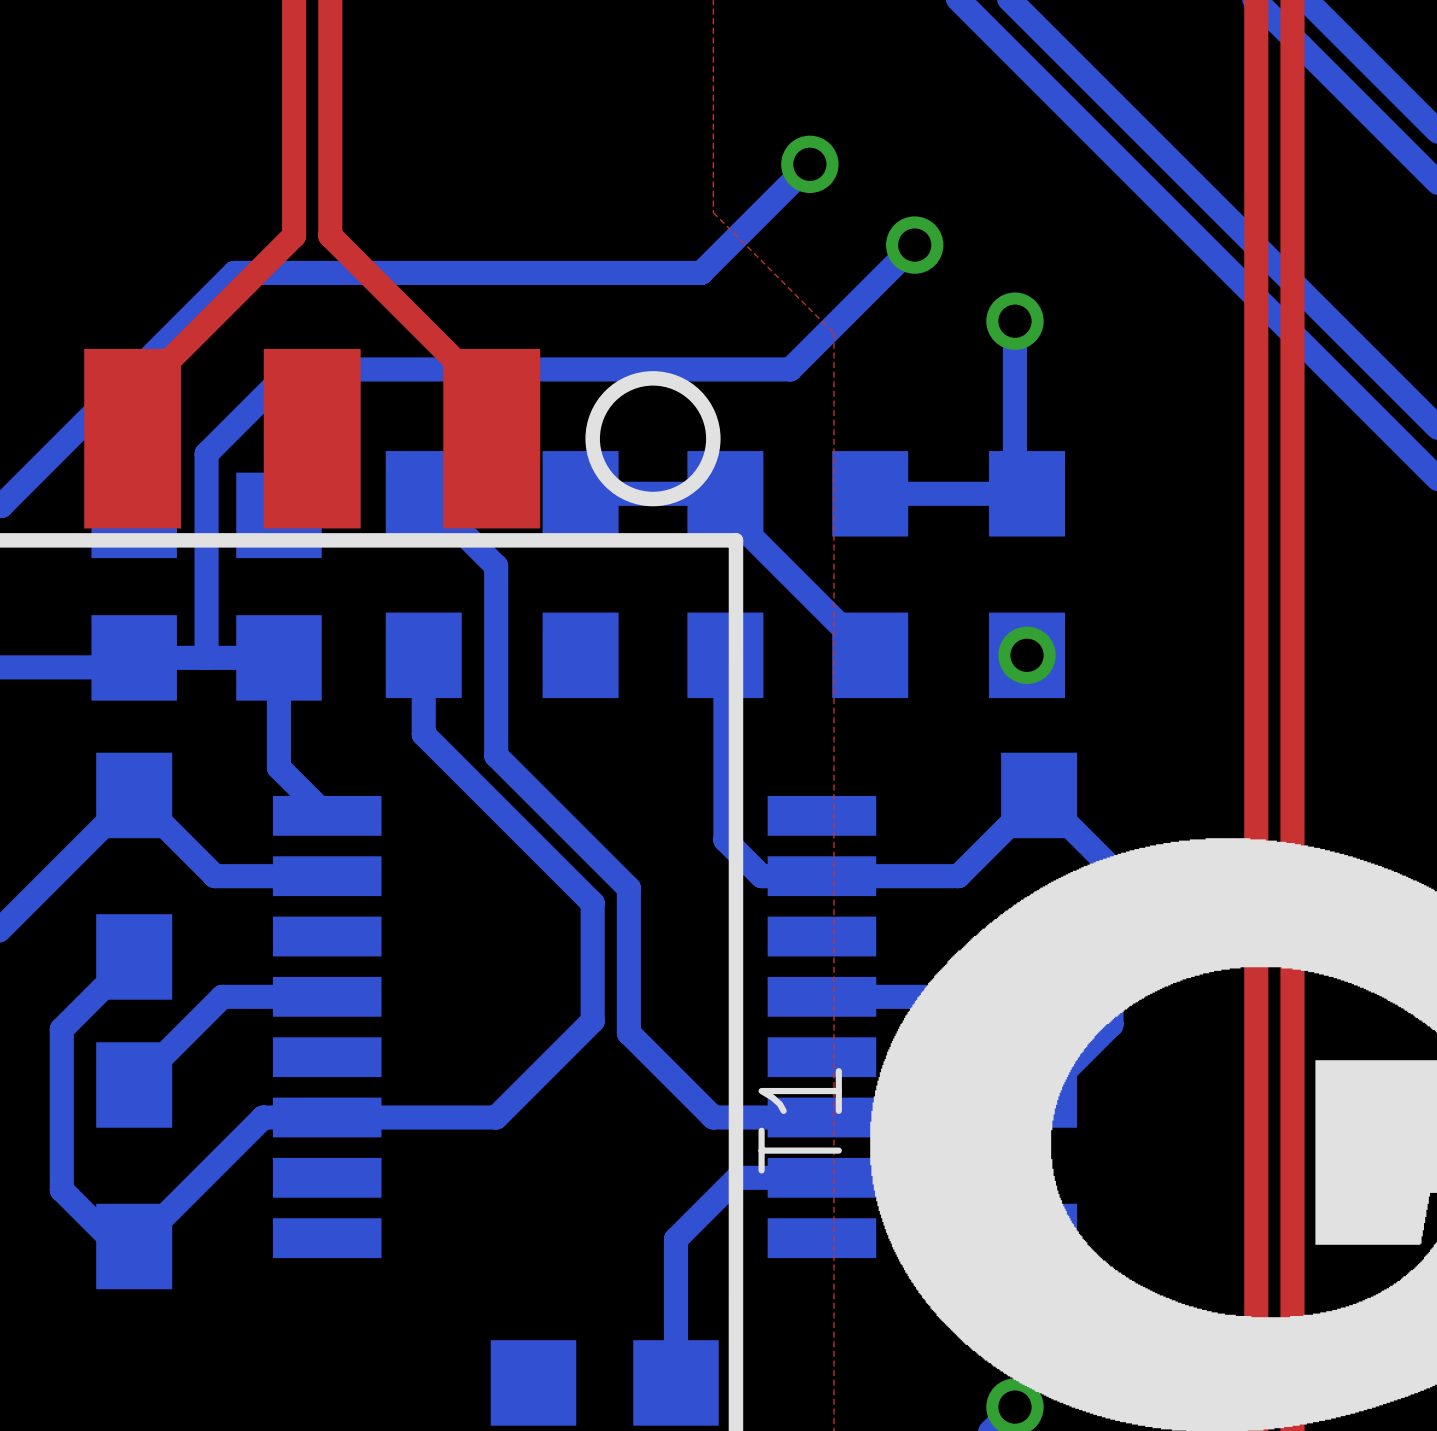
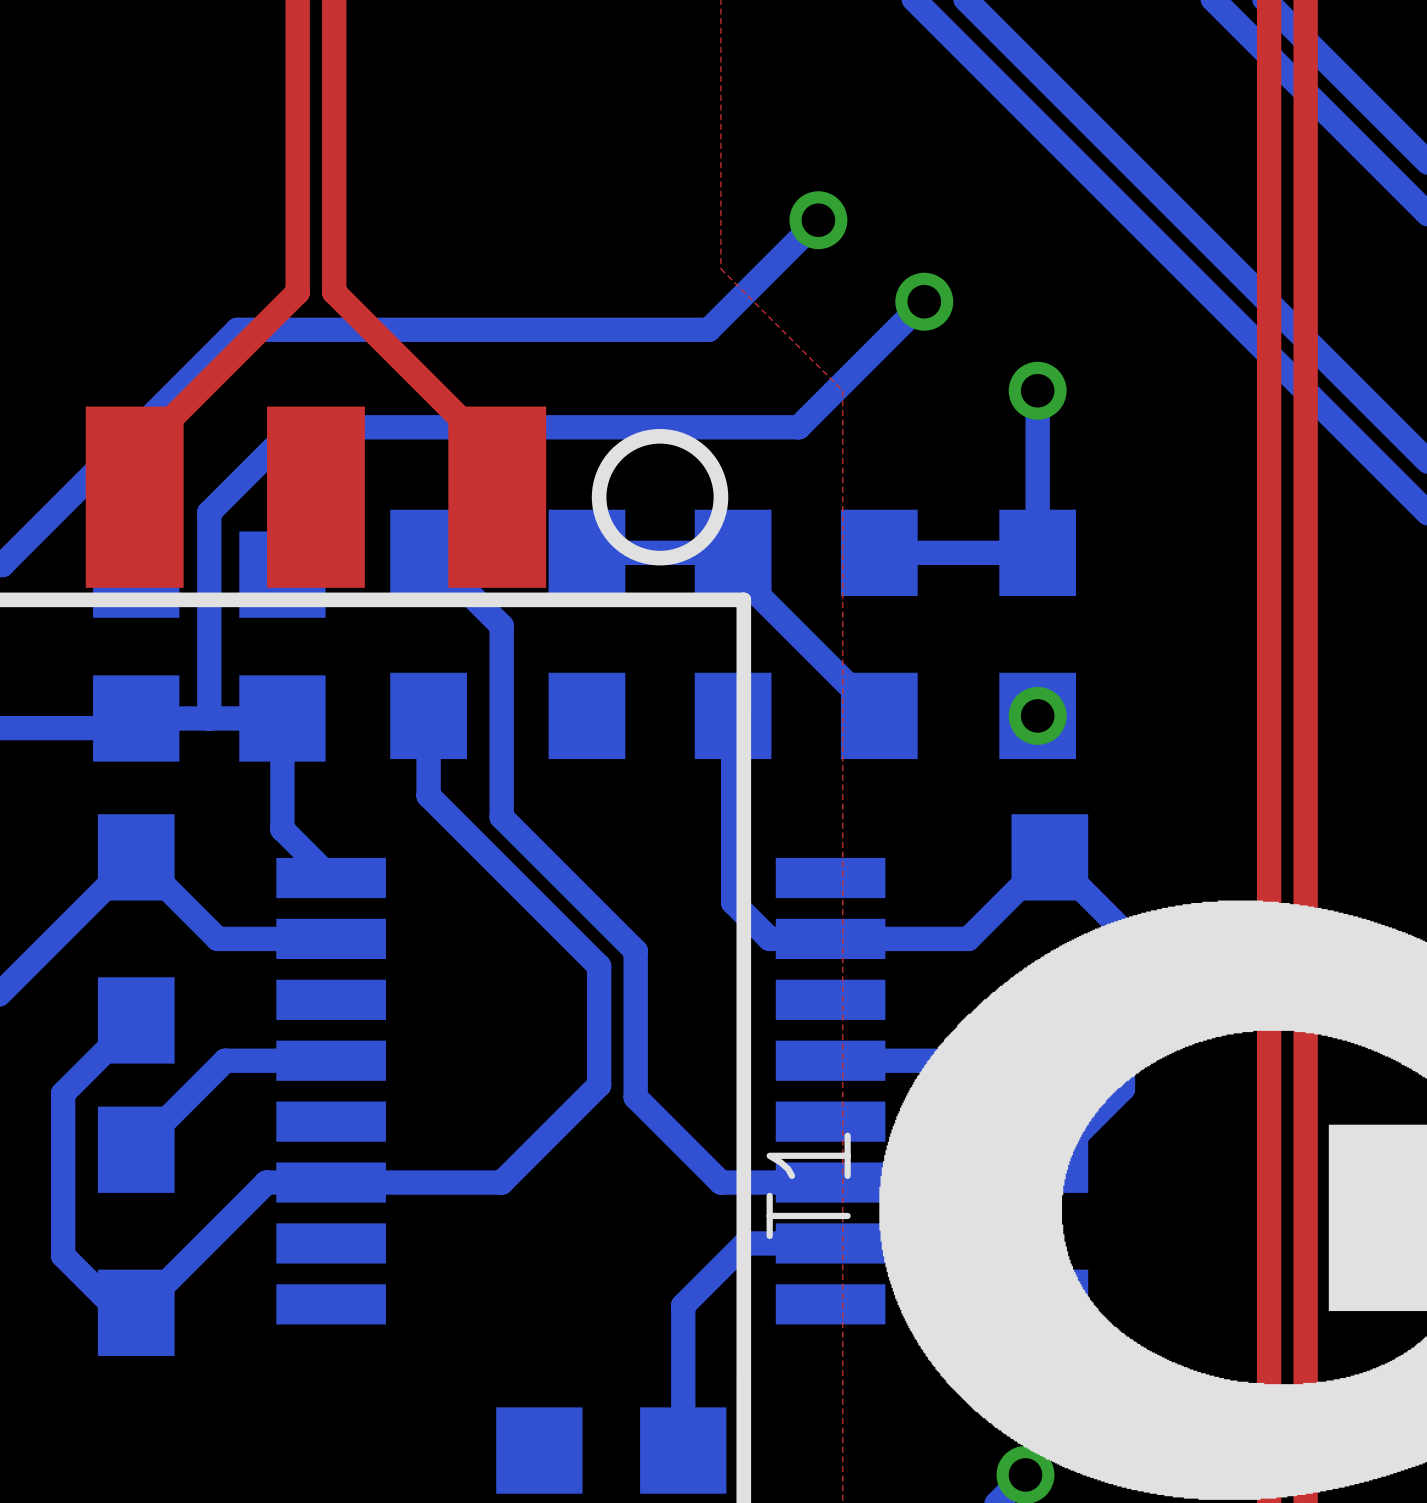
bottom track: (1014, 321) (1014, 481) (1027, 493) -> (1037, 390) (1037, 552)
via position: (1014, 321) -> (1037, 390)

